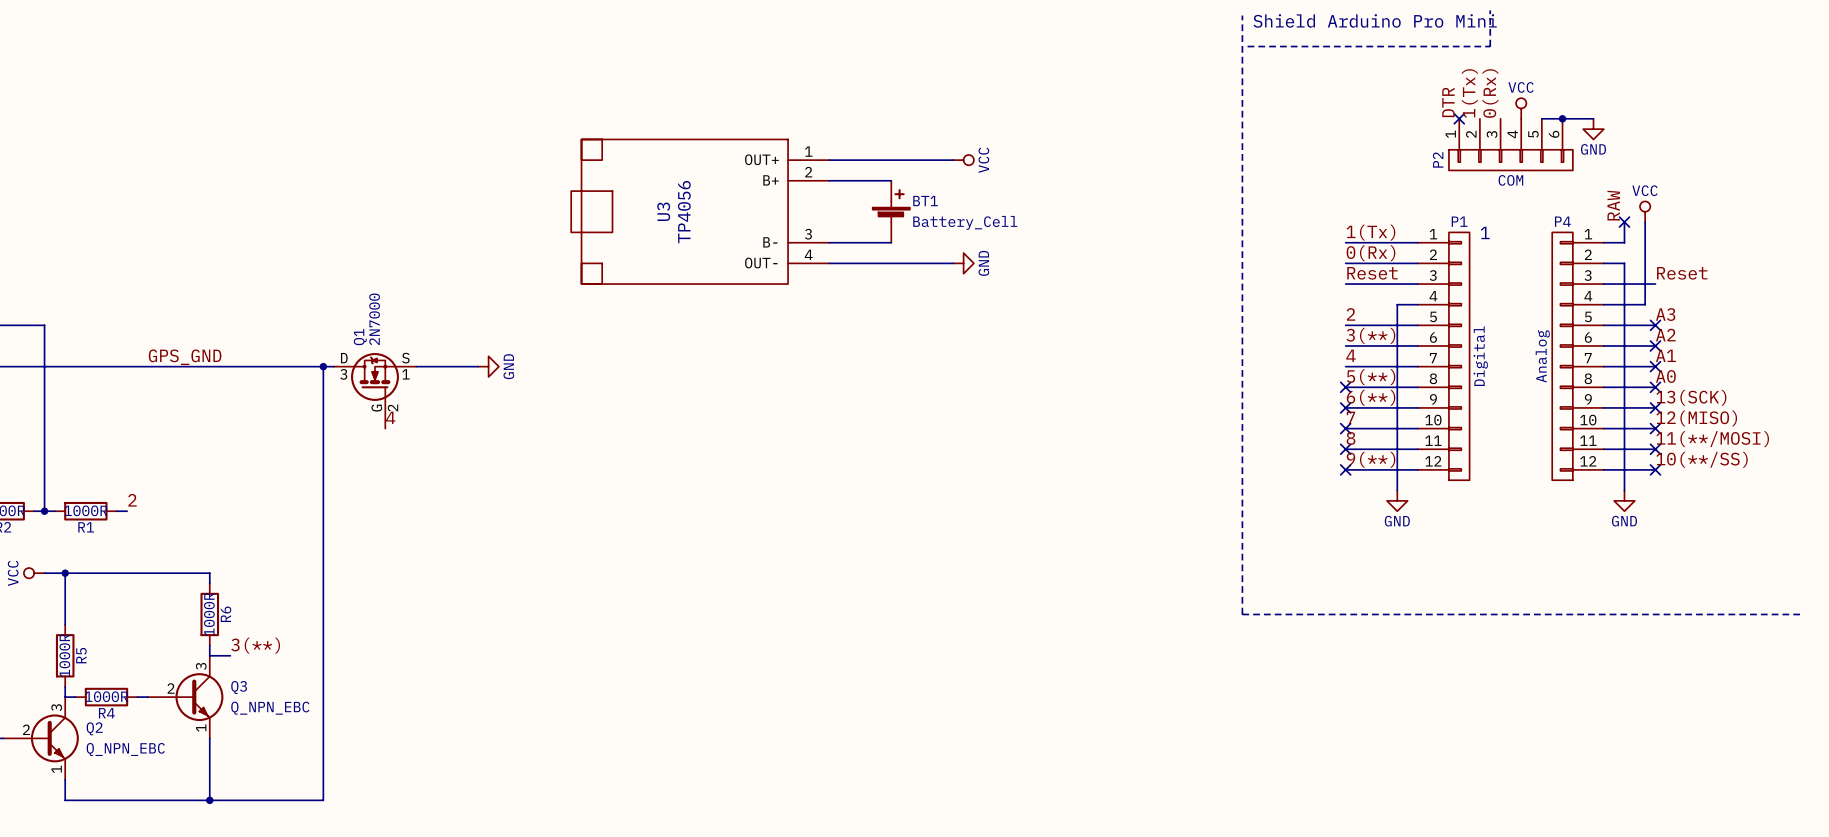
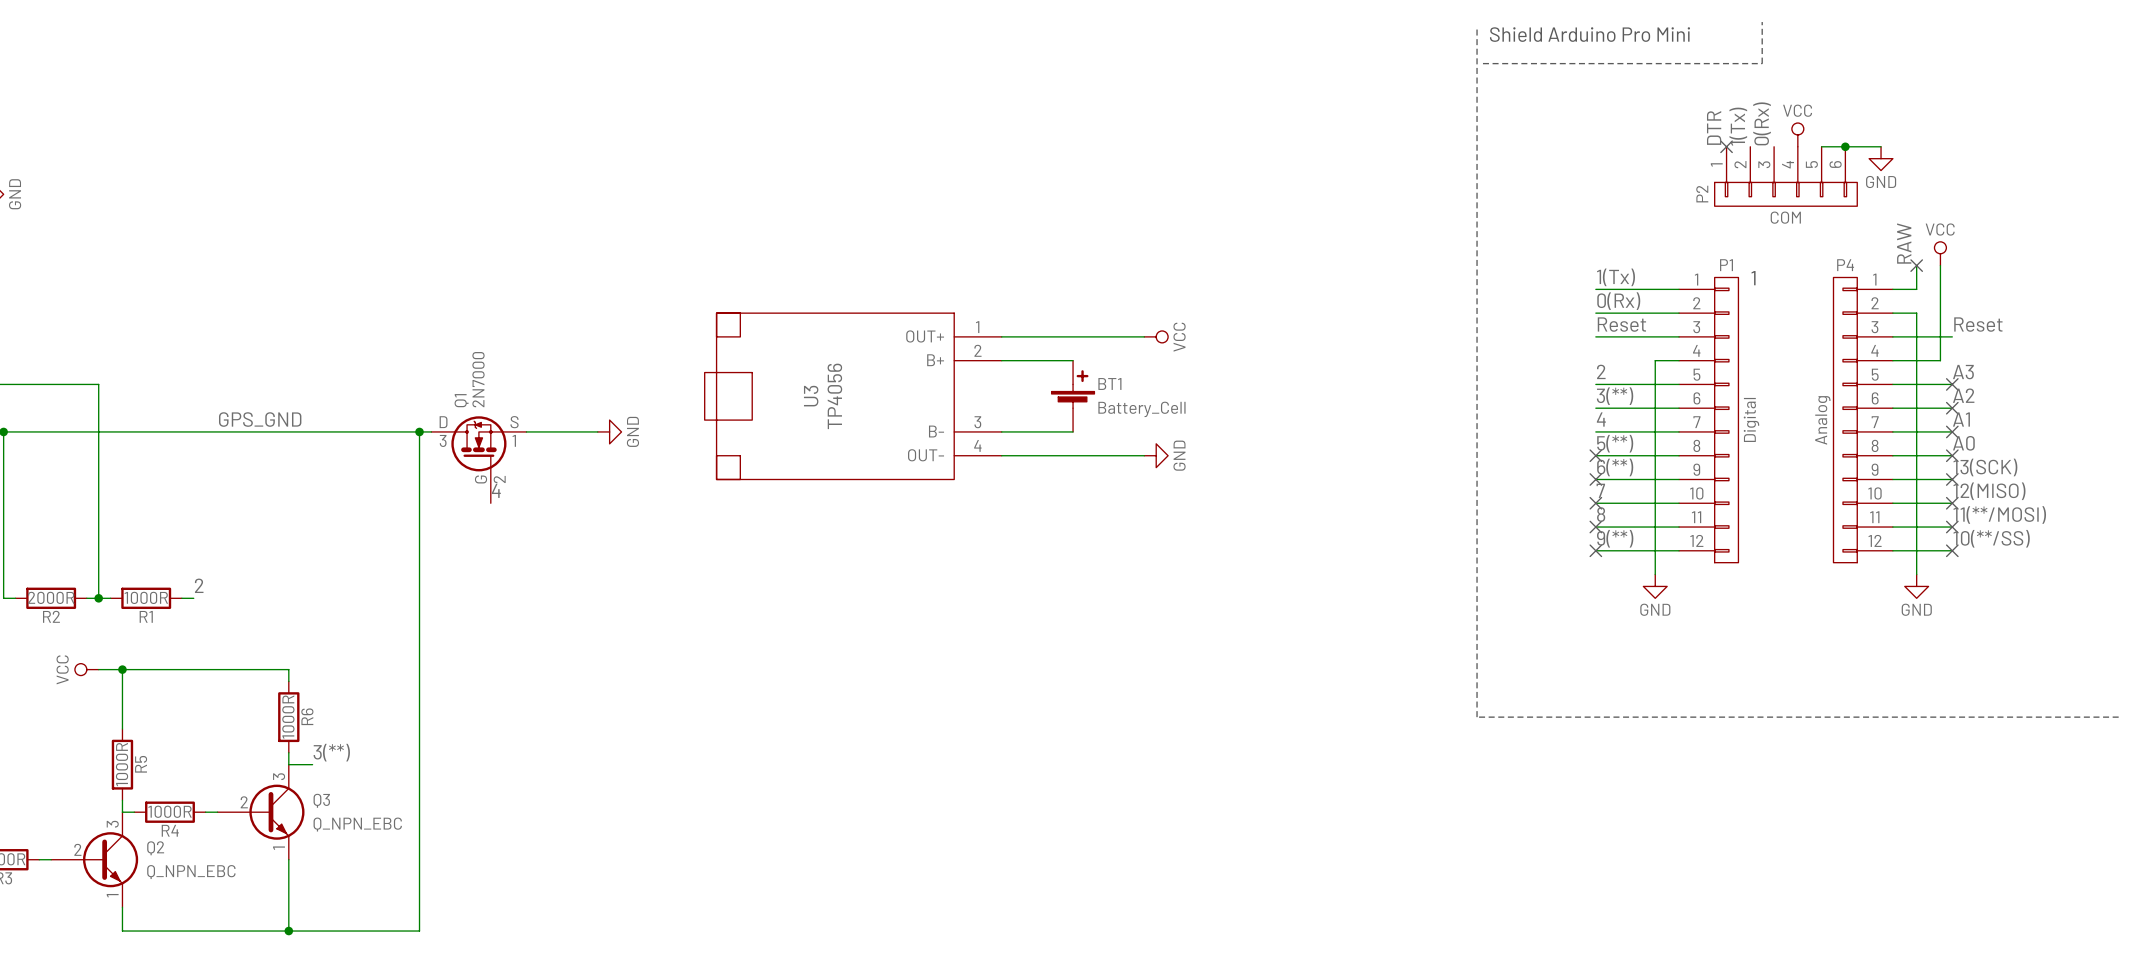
wire: (829, 160) (953, 160) -> (1001, 336) (1144, 336)
power symbol position: VCC (963, 160) -> VCC (1156, 336)
wire: (829, 180) (891, 180) -> (1001, 360) (1073, 360)
U3 position: (700, 211) -> (853, 396)
BT1 position: (891, 211) -> (1073, 396)
wire: (829, 242) (891, 242) -> (1001, 431) (1073, 431)
wire: (829, 263) (953, 263) -> (1001, 455) (1144, 455)
power symbol position: GND (963, 263) -> GND (1156, 455)

